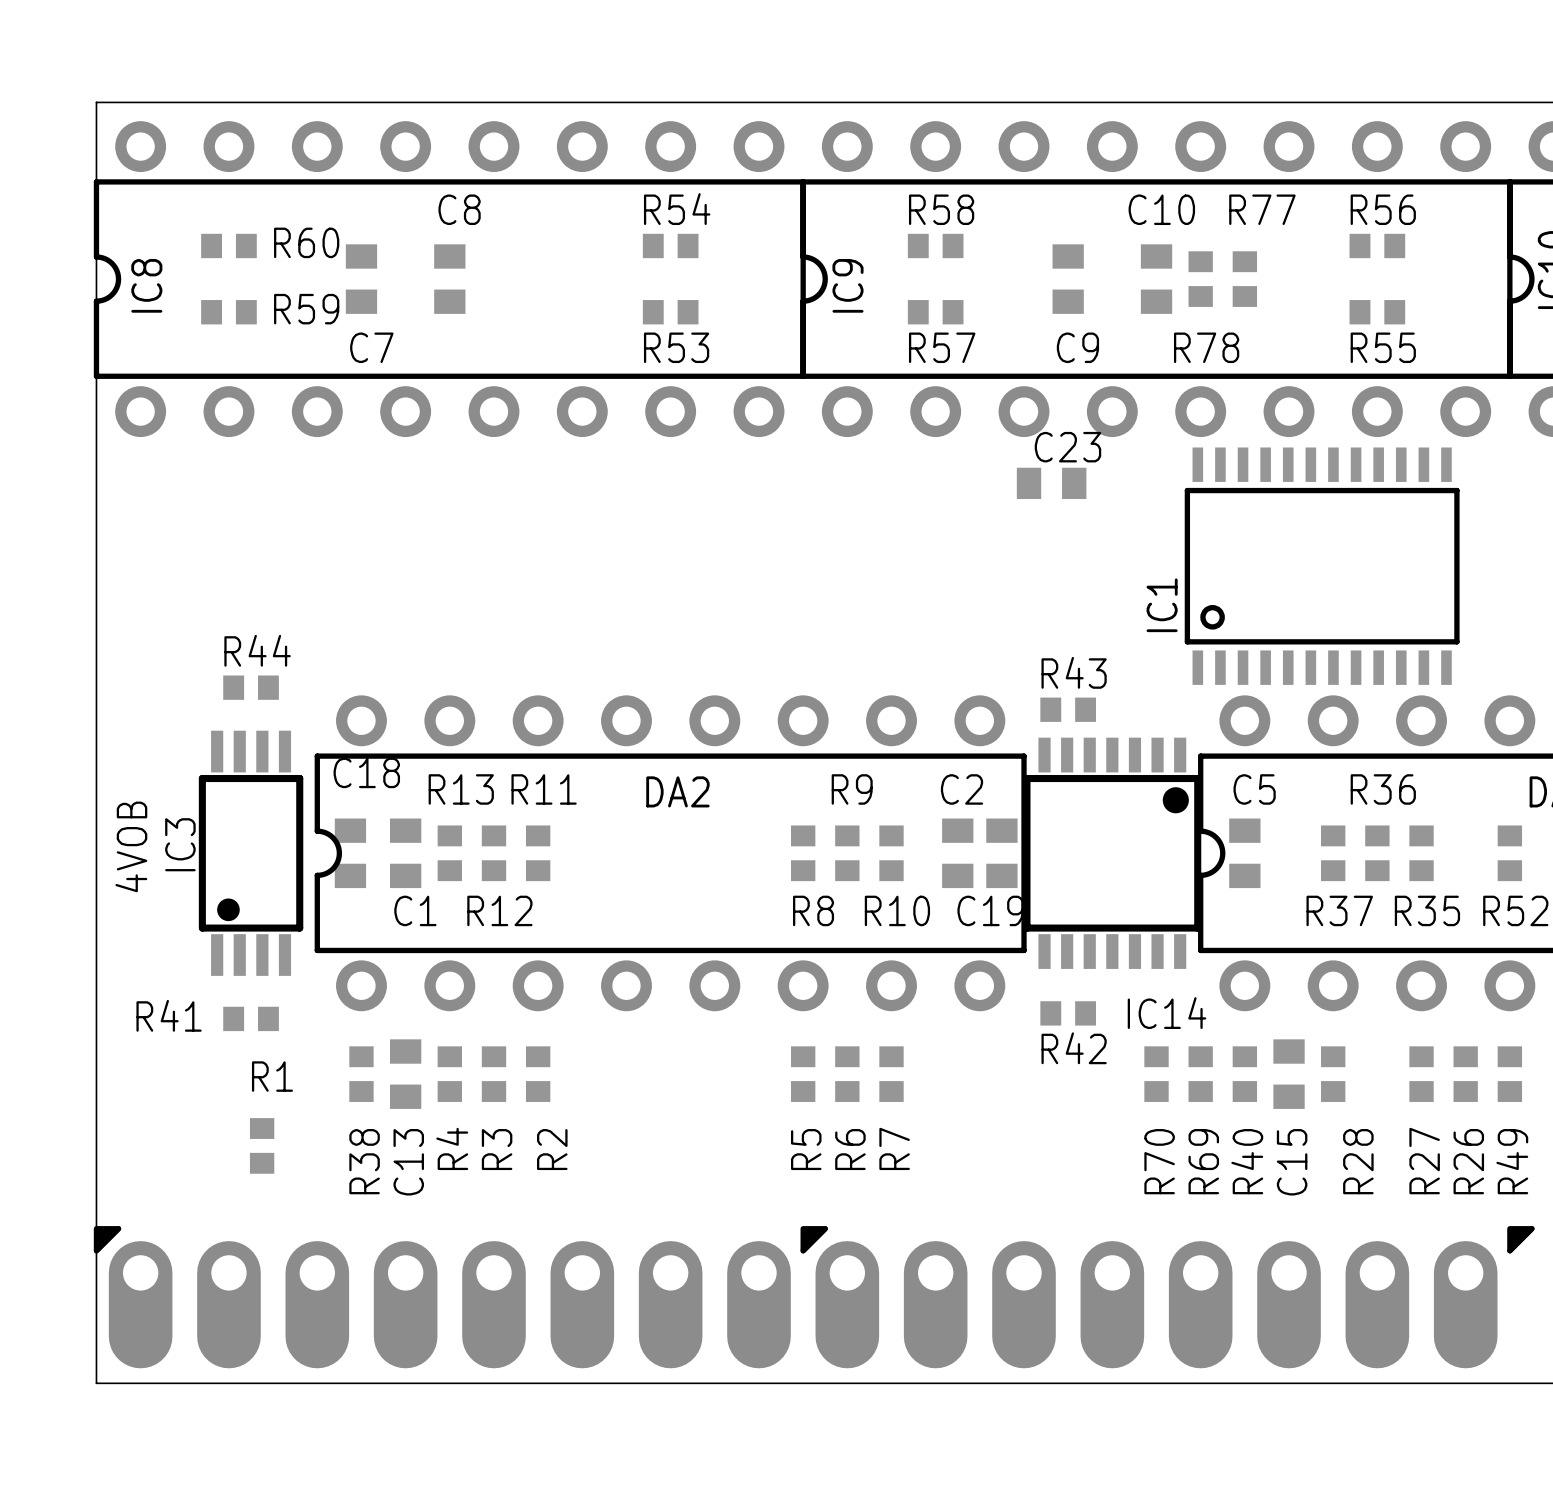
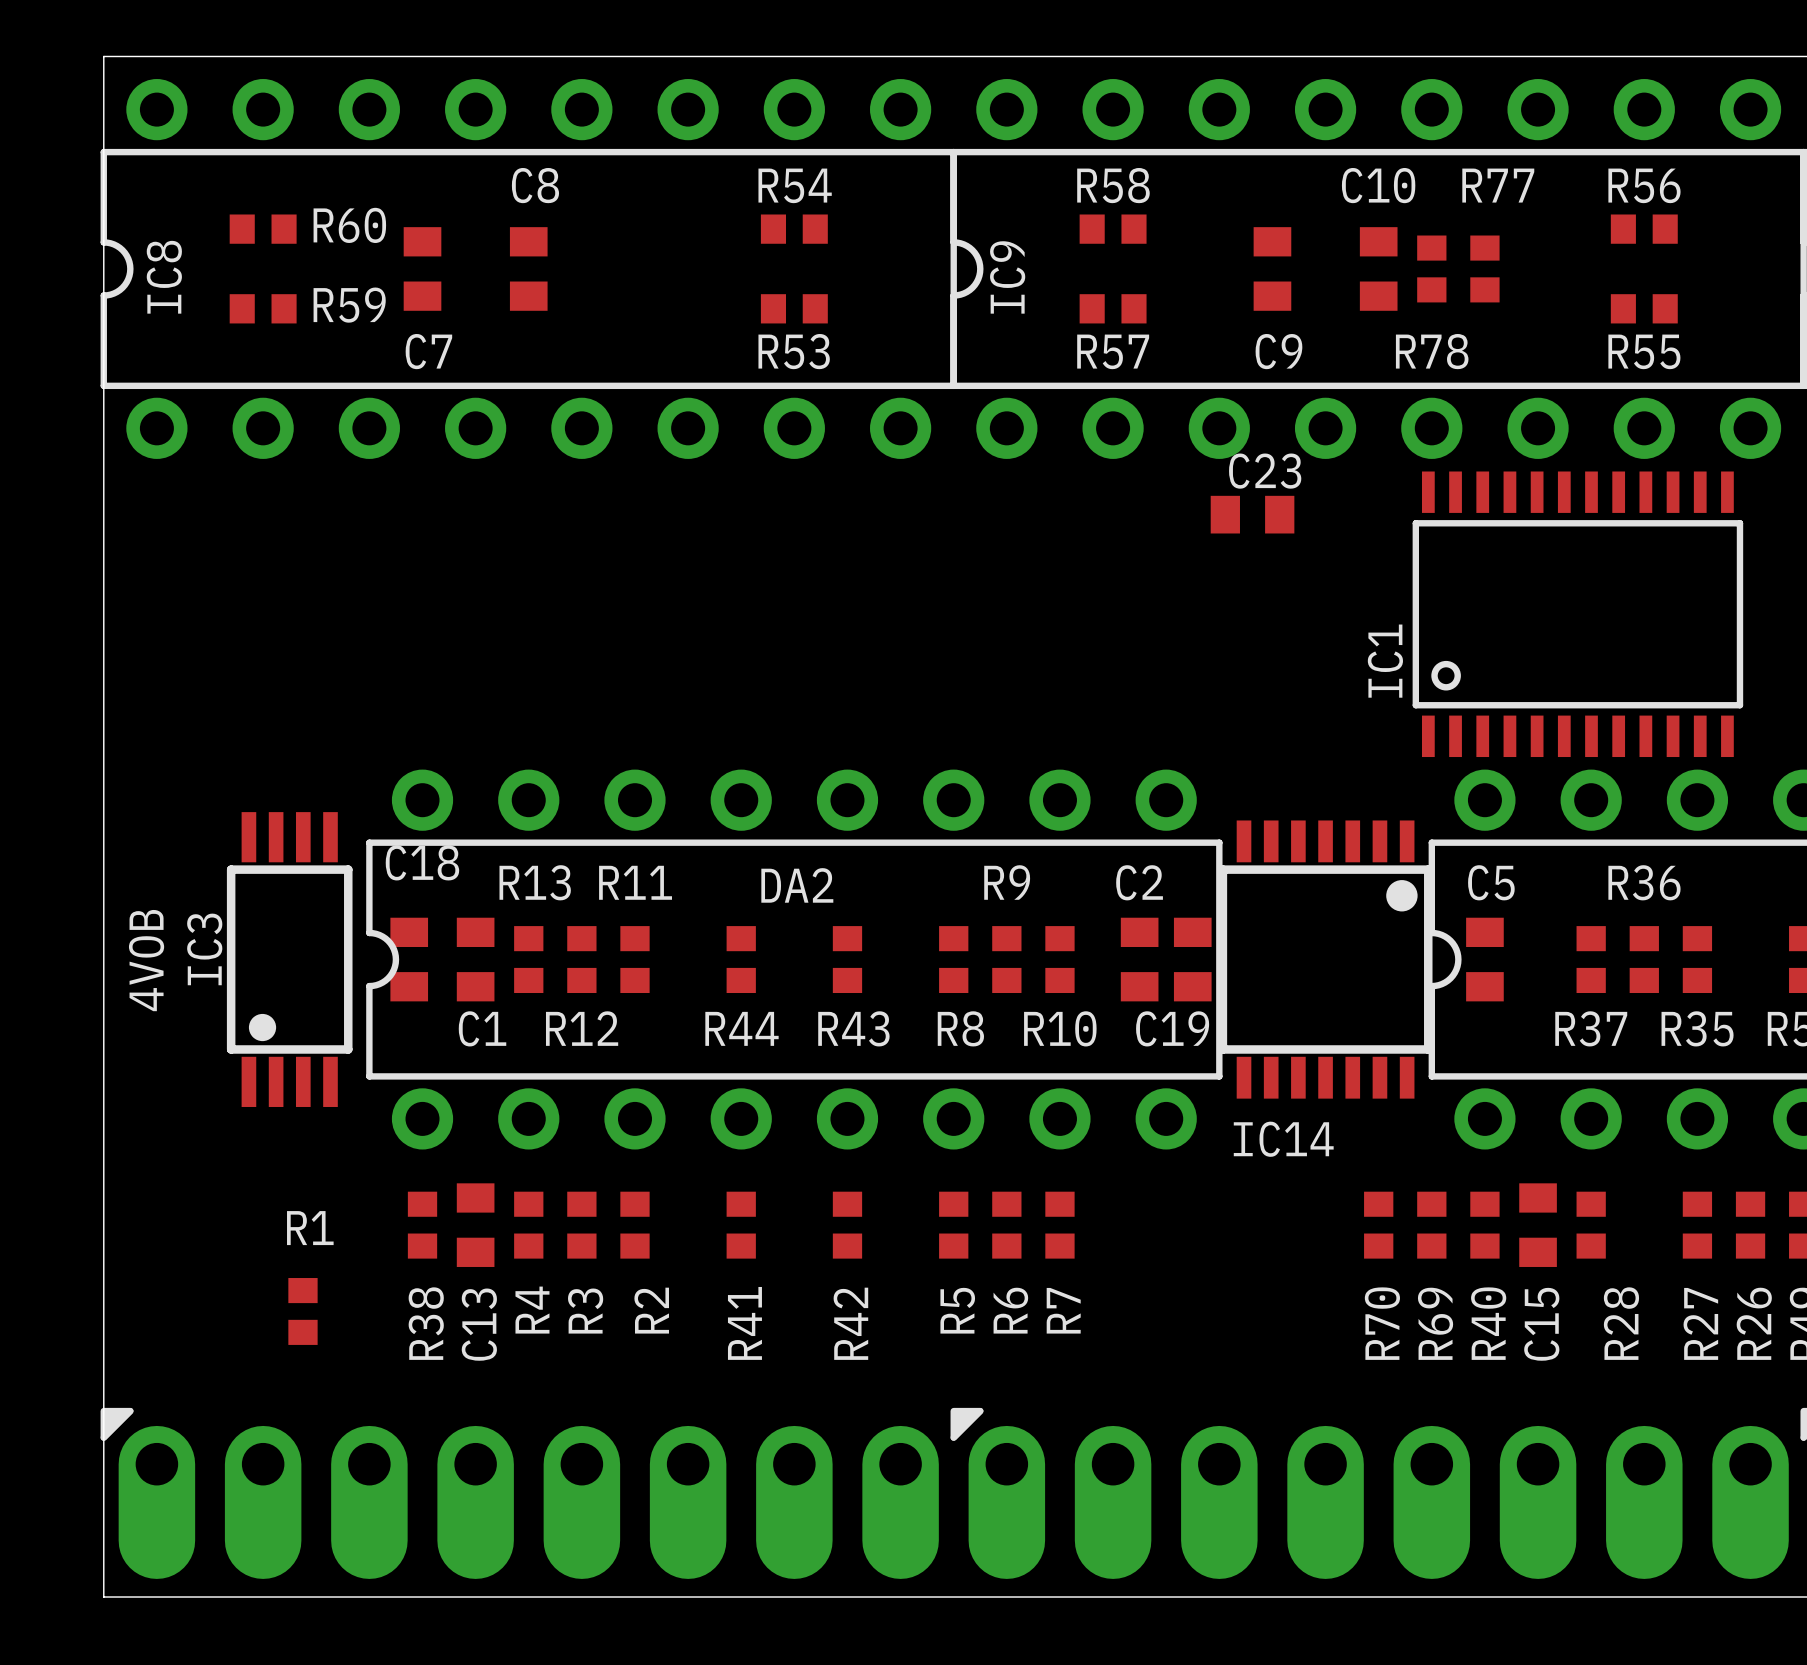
R44 rotation: 0° (251, 687) -> 90° clockwise (741, 959)
R44 position: (251, 687) -> (741, 959)
R43 rotation: 0° (1068, 709) -> 90° clockwise (847, 959)
R43 position: (1068, 709) -> (847, 959)
R42 rotation: 0° (1068, 1013) -> 90° clockwise (847, 1225)
R42 position: (1068, 1013) -> (847, 1225)
IC14 name position: IC14 (1167, 1013) -> IC14 (1283, 1139)
R41 name position: R41 (169, 1015) -> R41 (744, 1323)
R41 rotation: 0° (251, 1018) -> 90° clockwise (741, 1225)
R41 position: (251, 1018) -> (741, 1225)

